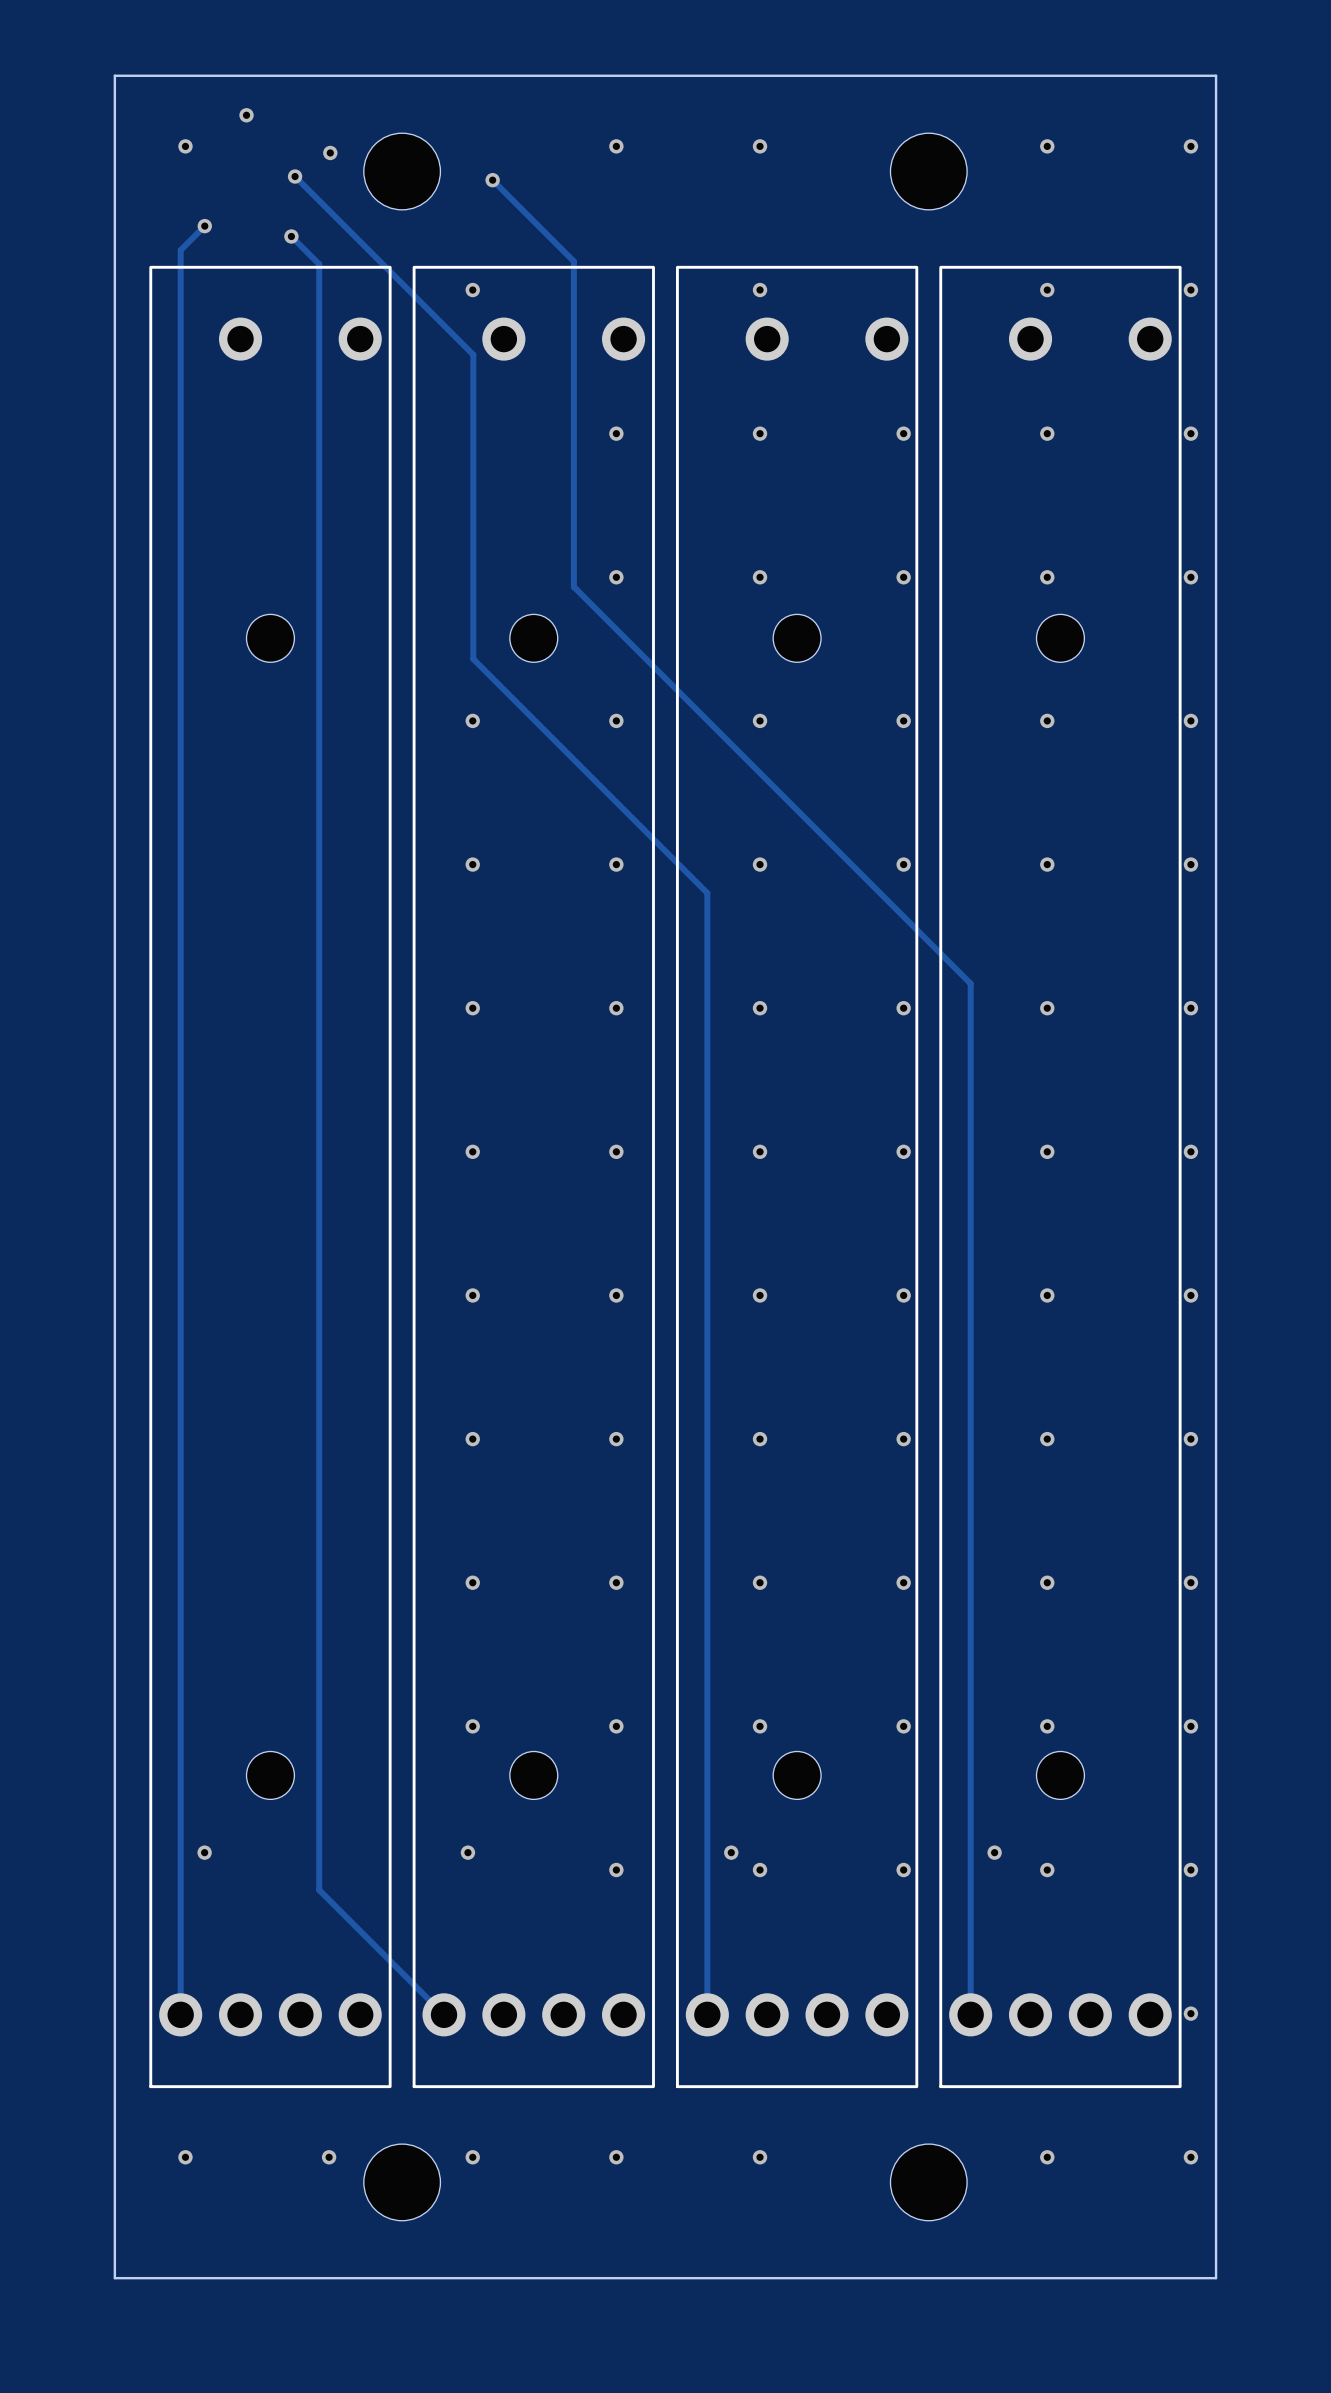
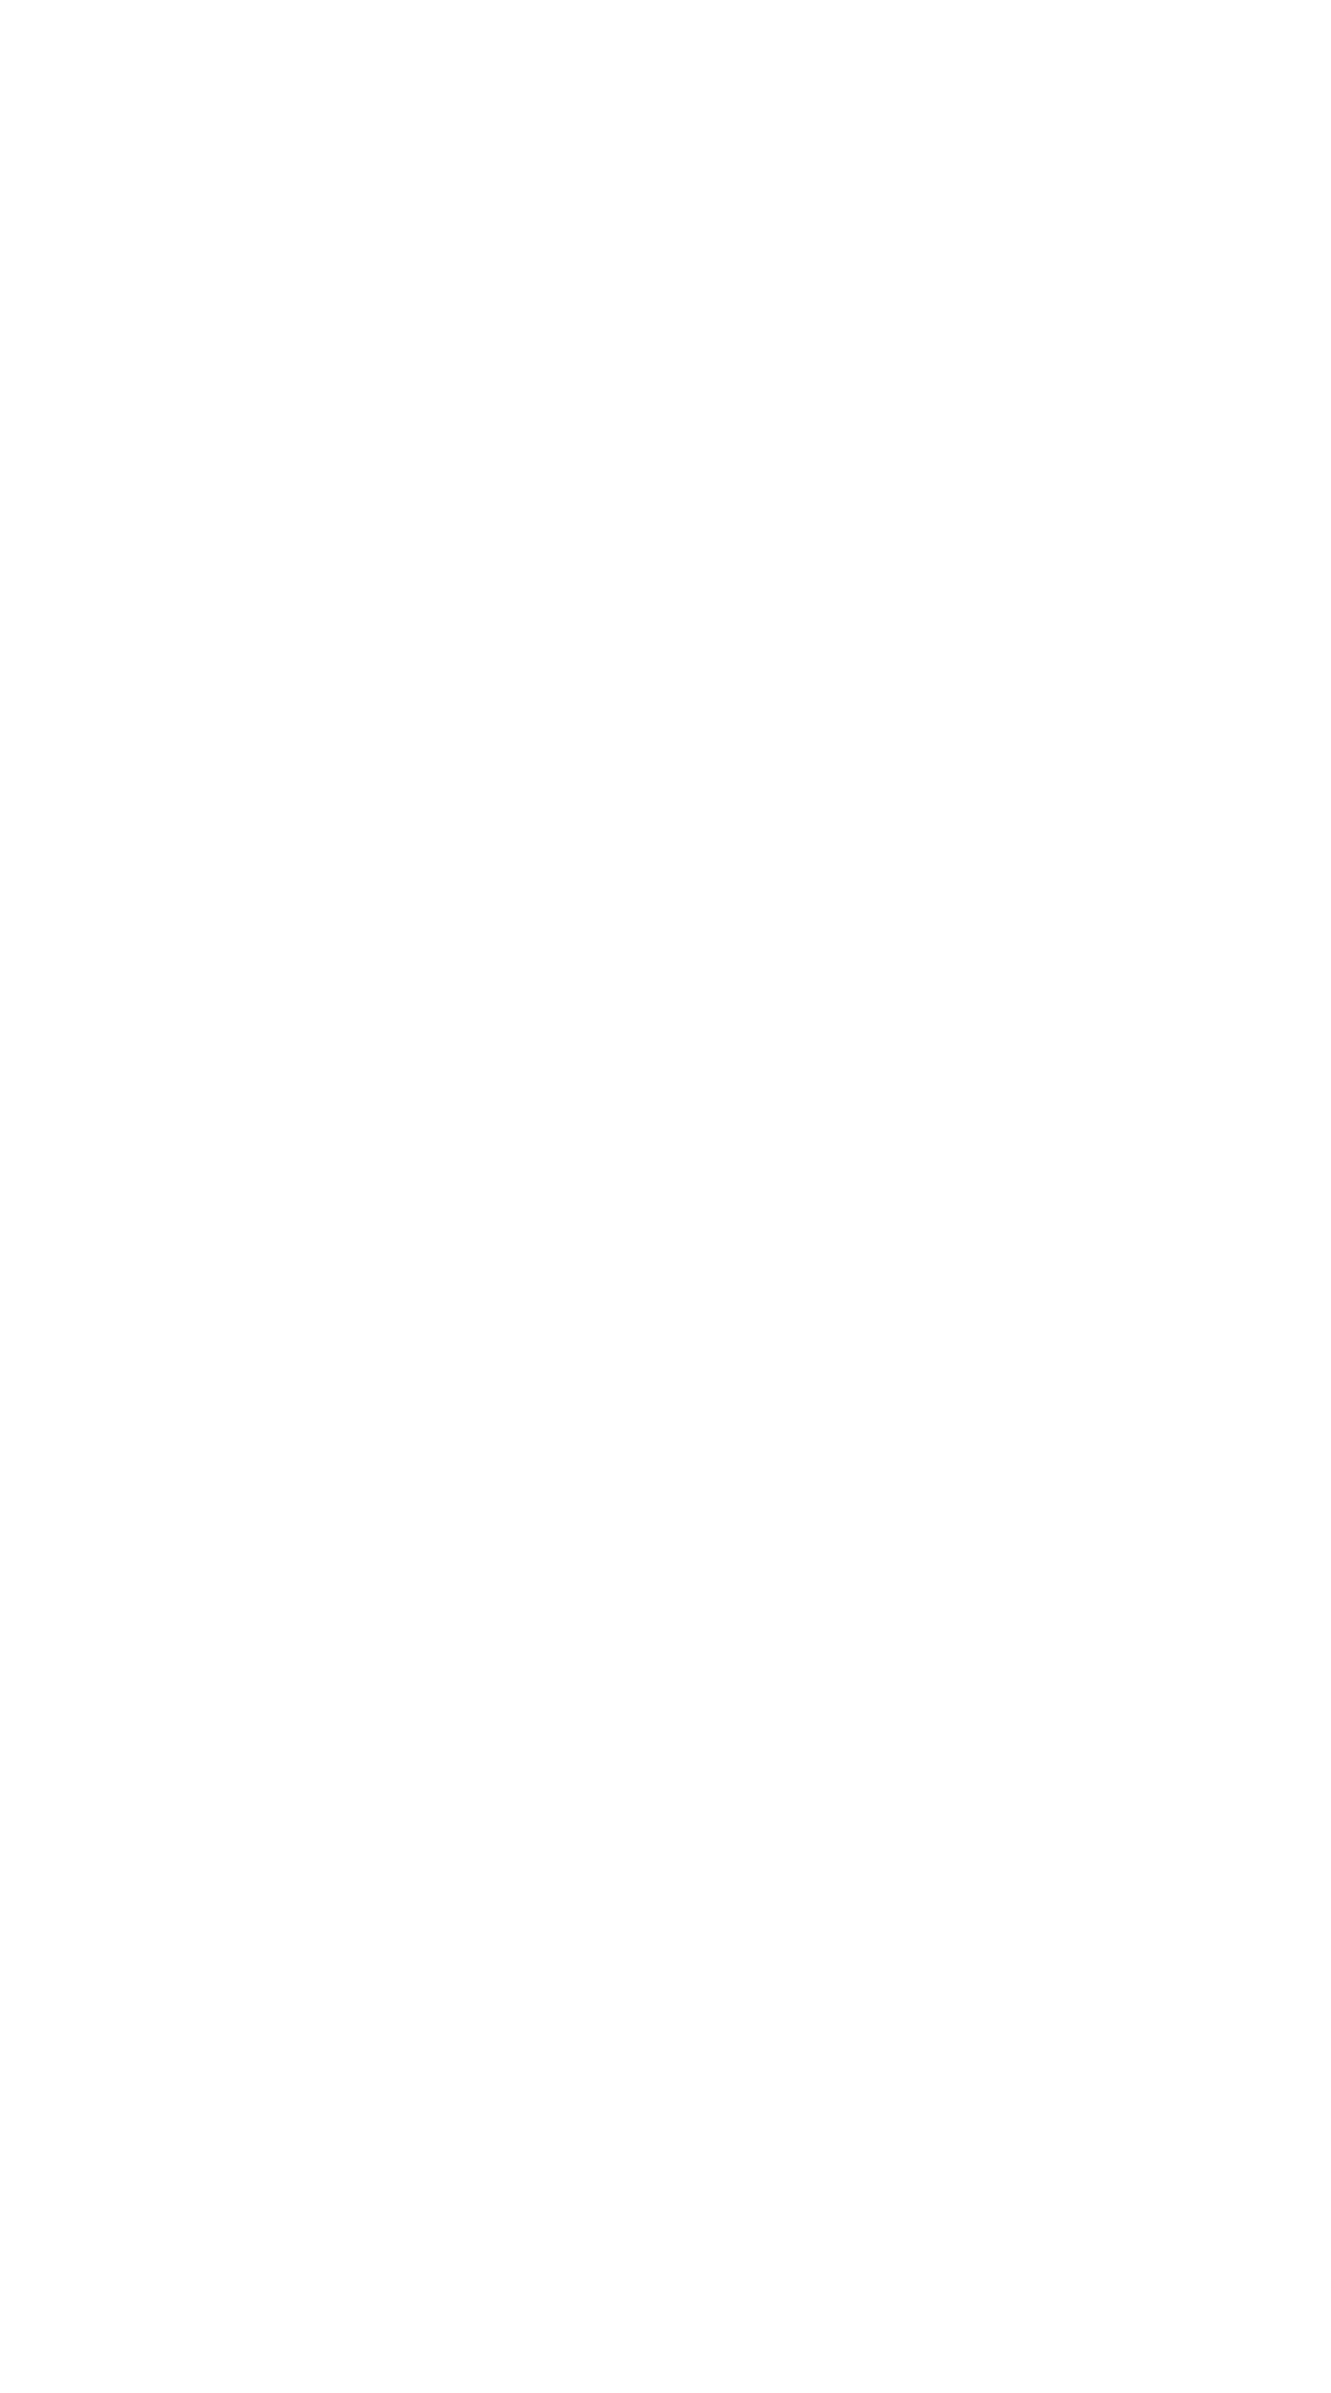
board edge: (114, 75) (1216, 75) (1216, 2278) (114, 2278) (114, 75) -> none
via: (246, 115) -> none
via: (185, 146) -> none
via: (616, 146) -> none
via: (760, 146) -> none
via: (1047, 146) -> none
via: (1190, 146) -> none
via: (330, 152) -> none
part: (402, 171) -> none
part: (928, 171) -> none
track: (295, 176) (473, 354) (473, 659) (707, 893) (707, 2014) -> none
via: (295, 176) -> none
track: (492, 180) (573, 261) (573, 586) (970, 983) (970, 2014) -> none
via: (492, 180) -> none
track: (204, 226) (180, 250) (180, 2014) -> none
via: (204, 226) -> none
track: (291, 236) (319, 264) (319, 1890) (444, 2014) -> none
via: (291, 236) -> none
via: (472, 290) -> none
via: (760, 290) -> none
via: (1047, 290) -> none
via: (1190, 290) -> none
via: (616, 433) -> none
via: (760, 433) -> none
via: (903, 433) -> none
via: (1047, 433) -> none
via: (1190, 433) -> none
via: (616, 577) -> none
via: (760, 577) -> none
via: (903, 577) -> none
via: (1047, 577) -> none
via: (1190, 577) -> none
via: (472, 720) -> none
via: (616, 720) -> none
via: (760, 720) -> none
via: (903, 720) -> none
via: (1047, 720) -> none
via: (1190, 720) -> none
via: (472, 864) -> none
via: (616, 864) -> none
via: (760, 864) -> none
via: (903, 864) -> none
via: (1047, 864) -> none
via: (1190, 864) -> none
via: (472, 1008) -> none
via: (616, 1008) -> none
via: (760, 1008) -> none
via: (903, 1008) -> none
via: (1047, 1008) -> none
via: (1190, 1008) -> none
via: (472, 1151) -> none
via: (616, 1151) -> none
via: (760, 1151) -> none
via: (903, 1151) -> none
via: (1047, 1151) -> none
via: (1190, 1151) -> none
part: (270, 1176) -> none
part: (533, 1176) -> none
part: (797, 1176) -> none
part: (1060, 1176) -> none
via: (472, 1295) -> none
via: (616, 1295) -> none
via: (760, 1295) -> none
via: (903, 1295) -> none
via: (1047, 1295) -> none
via: (1190, 1295) -> none
via: (472, 1439) -> none
via: (616, 1439) -> none
via: (760, 1439) -> none
via: (903, 1439) -> none
via: (1047, 1439) -> none
via: (1190, 1439) -> none
via: (472, 1582) -> none
via: (616, 1582) -> none
via: (760, 1582) -> none
via: (903, 1582) -> none
via: (1047, 1582) -> none
via: (1190, 1582) -> none
via: (472, 1726) -> none
via: (616, 1726) -> none
via: (760, 1726) -> none
via: (903, 1726) -> none
via: (1047, 1726) -> none
via: (1190, 1726) -> none
via: (204, 1852) -> none
via: (467, 1852) -> none
via: (731, 1852) -> none
via: (994, 1852) -> none
via: (616, 1870) -> none
via: (760, 1870) -> none
via: (903, 1870) -> none
via: (1047, 1870) -> none
via: (1190, 1870) -> none
via: (1190, 2013) -> none
via: (185, 2157) -> none
via: (329, 2157) -> none
via: (472, 2157) -> none
via: (616, 2157) -> none
via: (760, 2157) -> none
via: (1047, 2157) -> none
via: (1190, 2157) -> none
part: (402, 2182) -> none
part: (928, 2182) -> none

